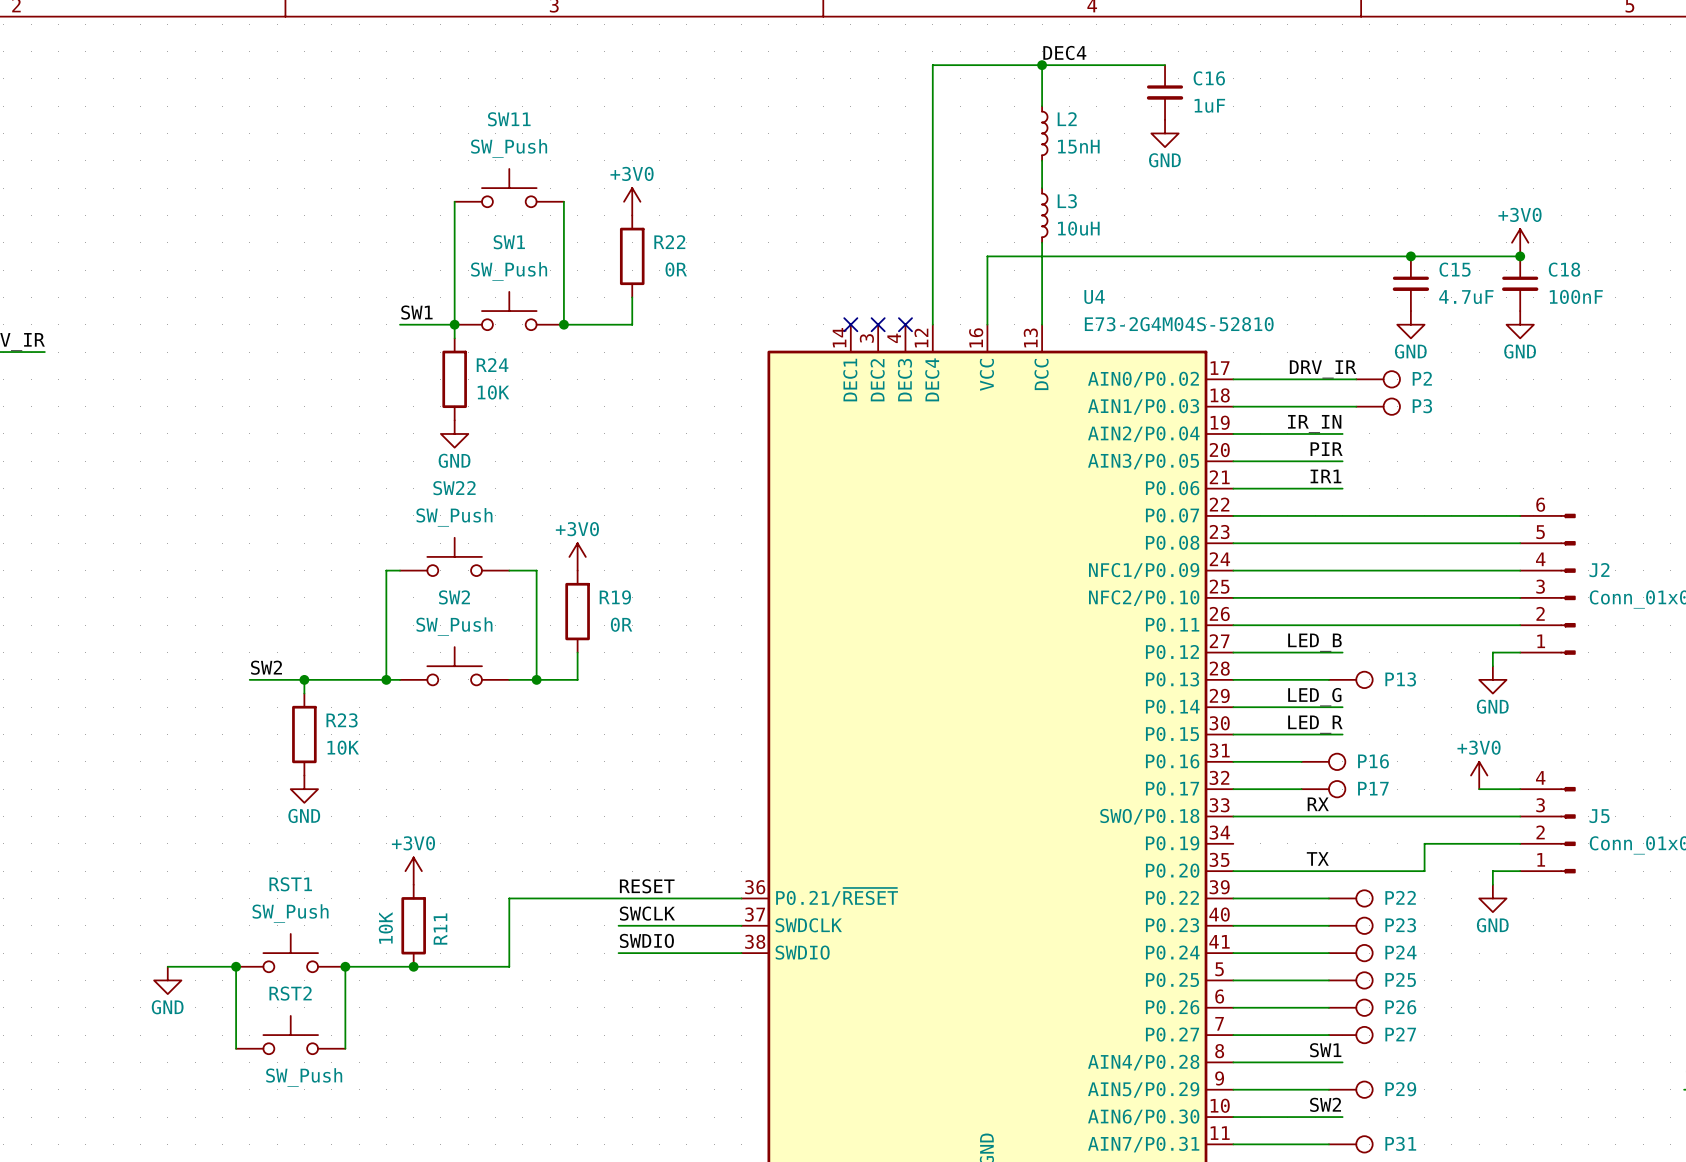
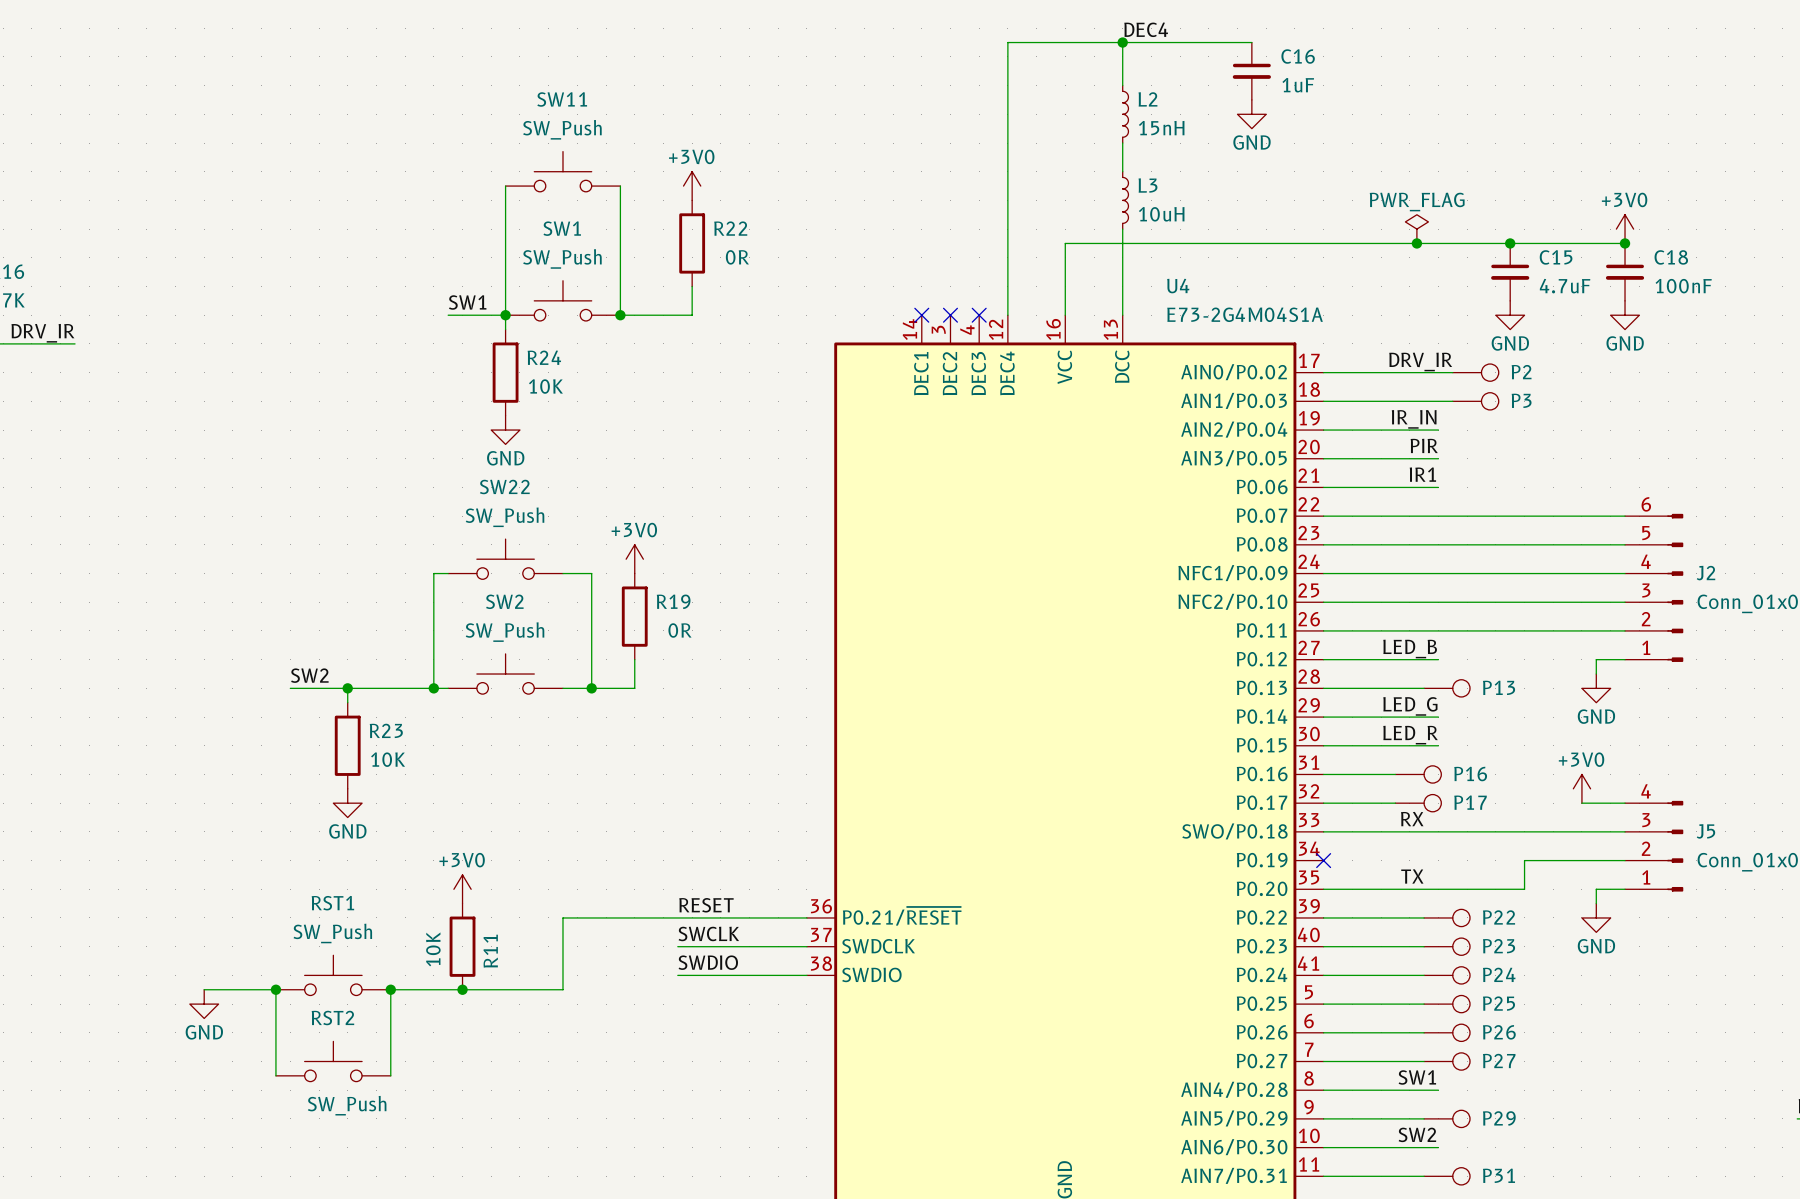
power symbol: none -> PWR_FLAG (1416, 229)
junction: none -> (1416, 243)
U4 value: E73-2G4M04S-52810 (1179, 324) -> E73-2G4M04S1A (1245, 314)
no-connect mark: none -> (1323, 860)

